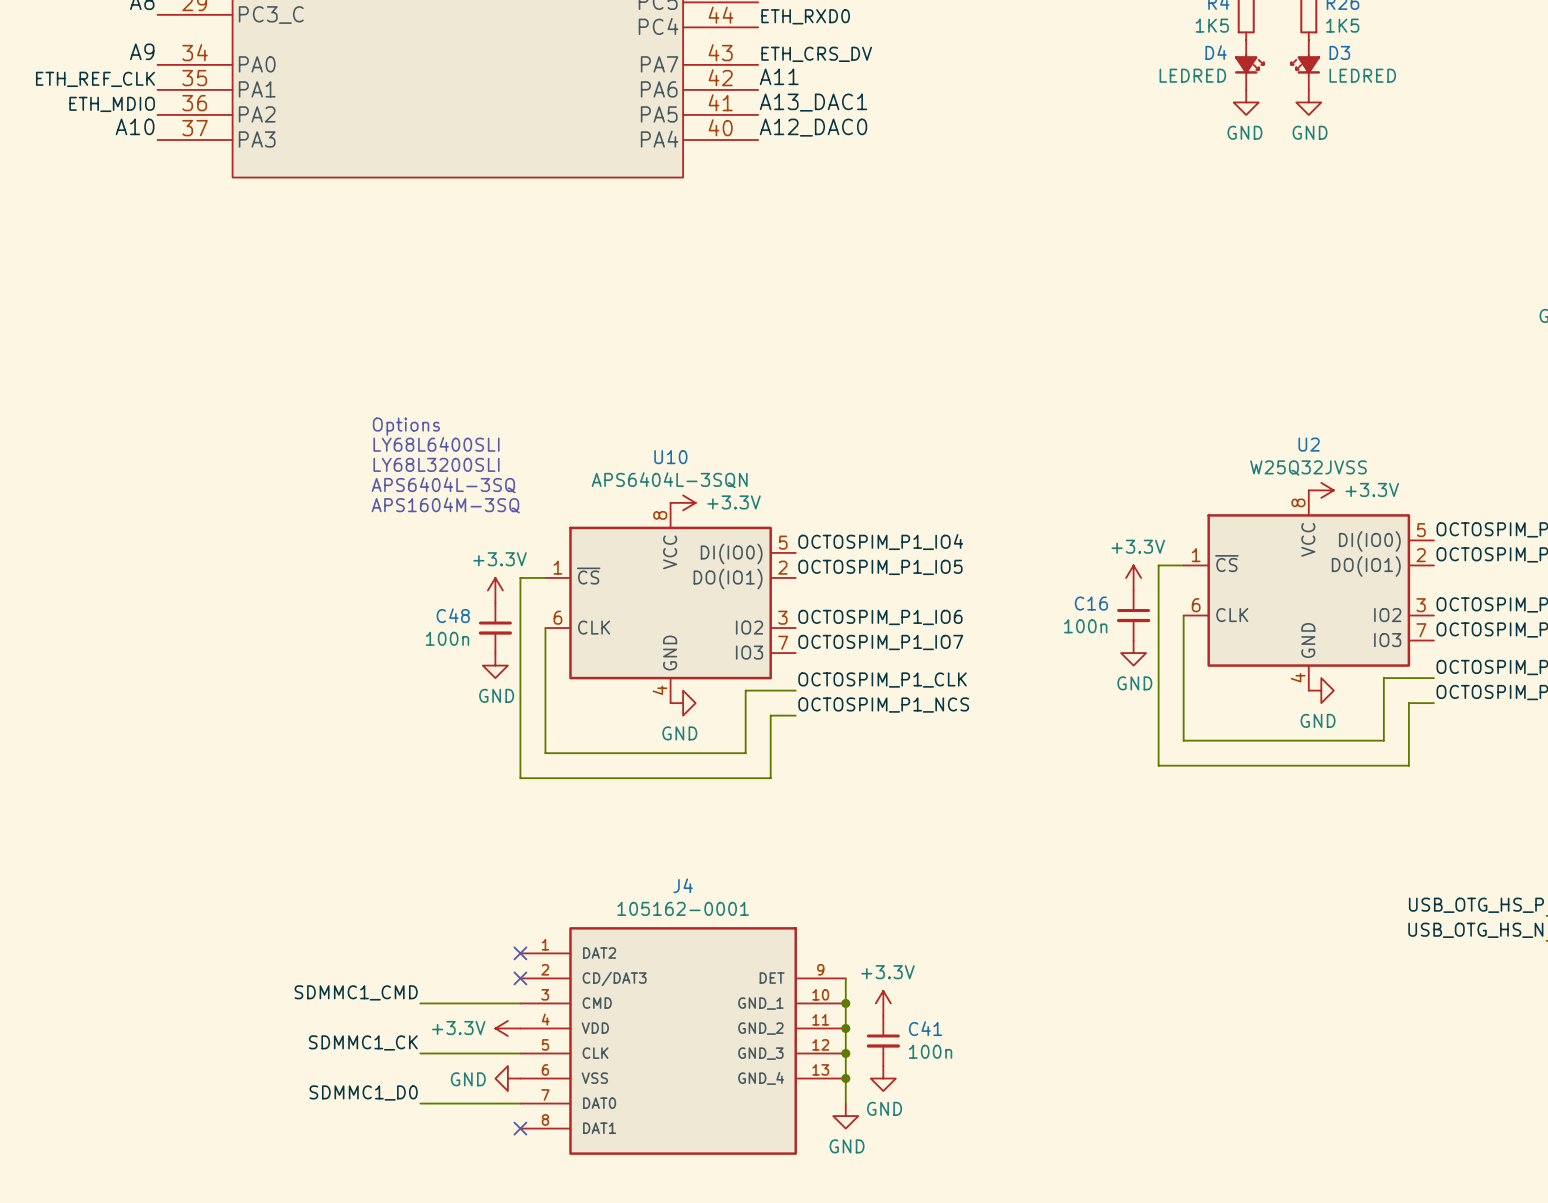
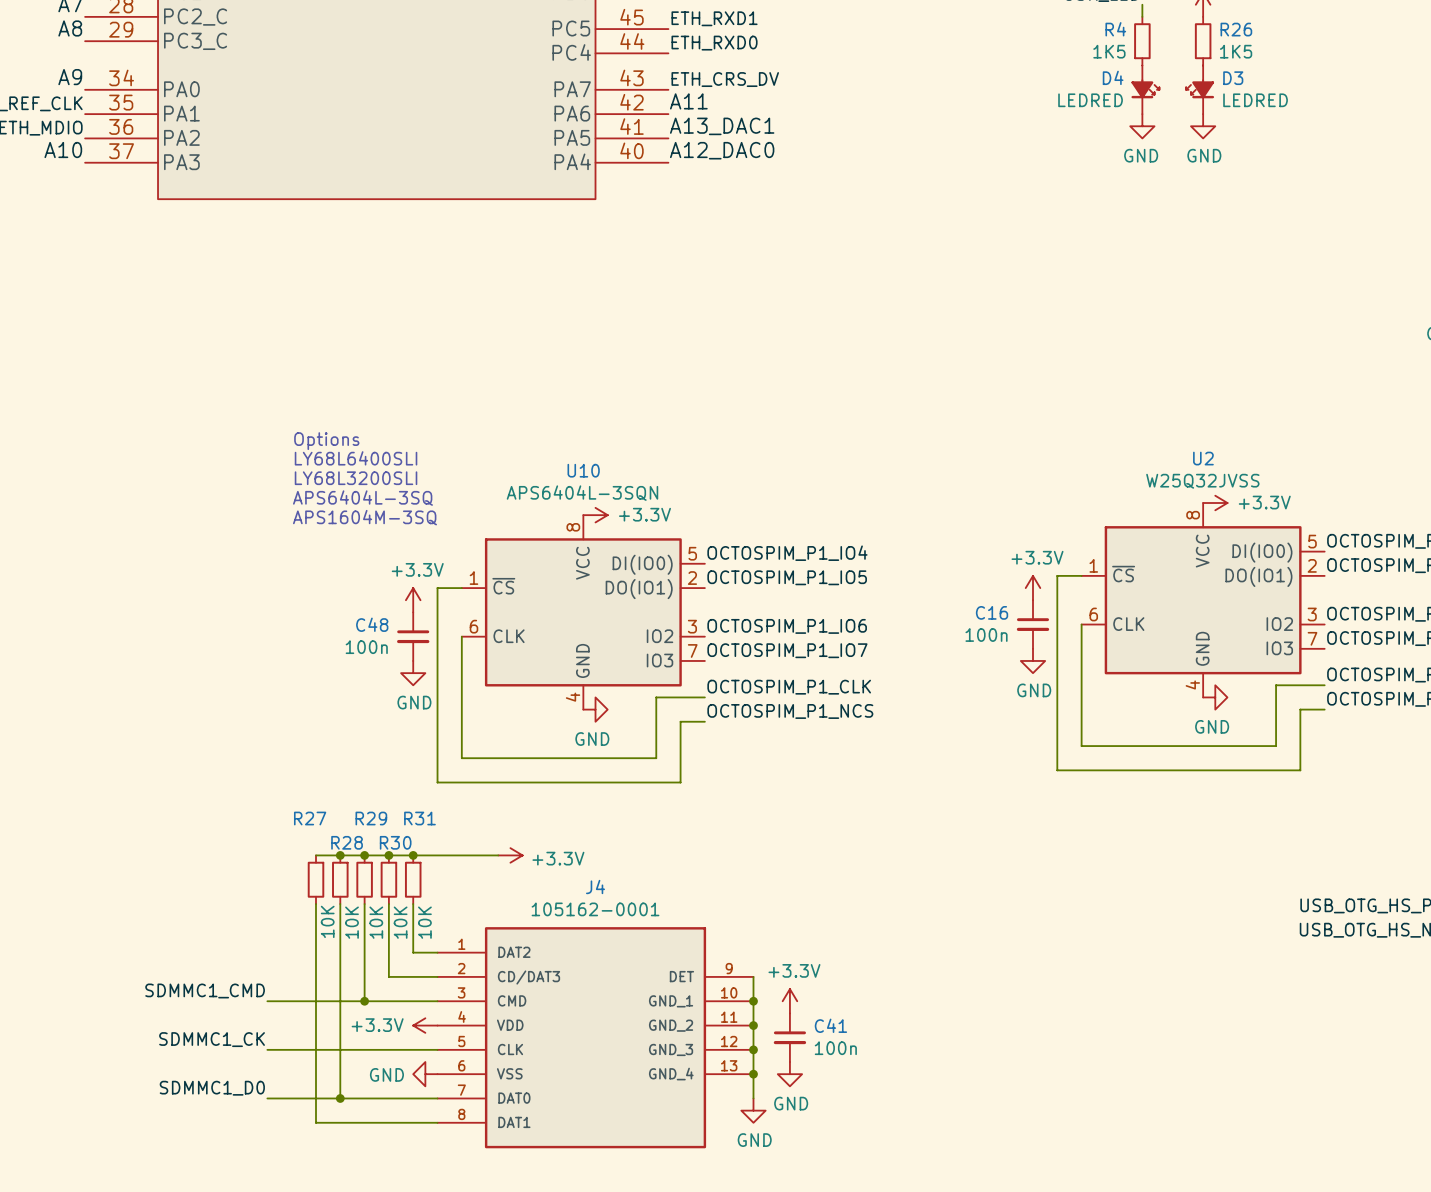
wire: none -> (316, 855) (498, 855)
junction: none -> (340, 855)
junction: none -> (364, 855)
junction: none -> (388, 855)
junction: none -> (413, 855)
power symbol: none -> +3.3V (510, 855)
R27: none -> 10K (316, 879)
R28: none -> 10K (340, 879)
R29: none -> 10K (364, 879)
R30: none -> 10K (388, 879)
R31: none -> 10K (413, 879)
wire: none -> (316, 904) (316, 1122) (437, 1122)
wire: none -> (340, 904) (340, 1098) (267, 1098)
wire: none -> (364, 904) (364, 1001)
wire: none -> (388, 904) (388, 976) (437, 976)
wire: none -> (413, 904) (413, 952) (437, 952)
no-connect mark: (520, 953) -> none
no-connect mark: (520, 978) -> none
label position: SDMMC1_CMD (356, 992) -> SDMMC1_CMD (205, 990)
wire: none -> (267, 1001) (340, 1001)
junction: none -> (364, 1001)
label position: SDMMC1_CK (363, 1042) -> SDMMC1_CK (212, 1039)
wire: none -> (267, 1049) (340, 1049)
label position: SDMMC1_D0 (363, 1092) -> SDMMC1_D0 (212, 1088)
junction: none -> (340, 1098)
no-connect mark: (520, 1128) -> none

